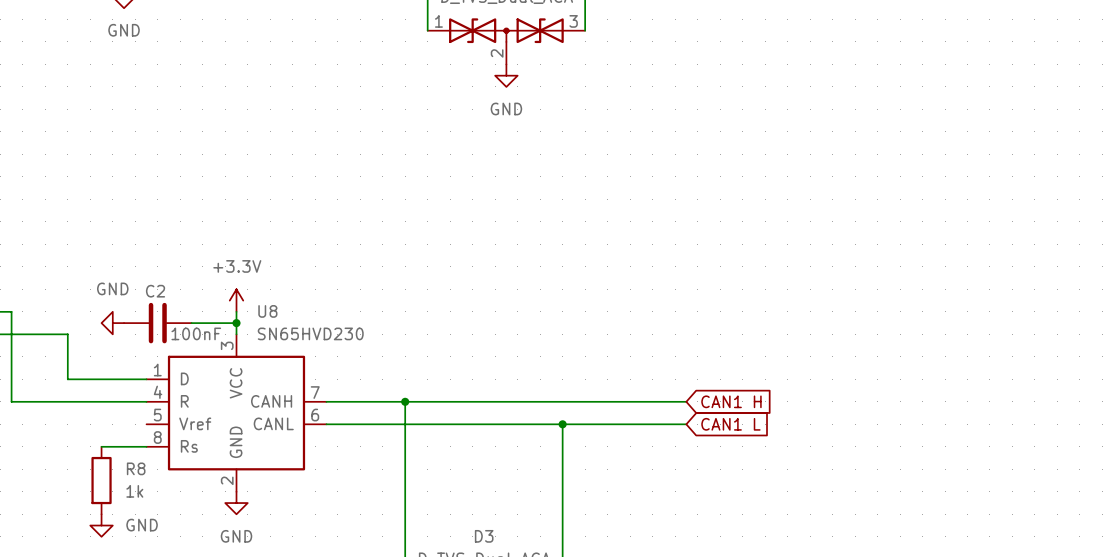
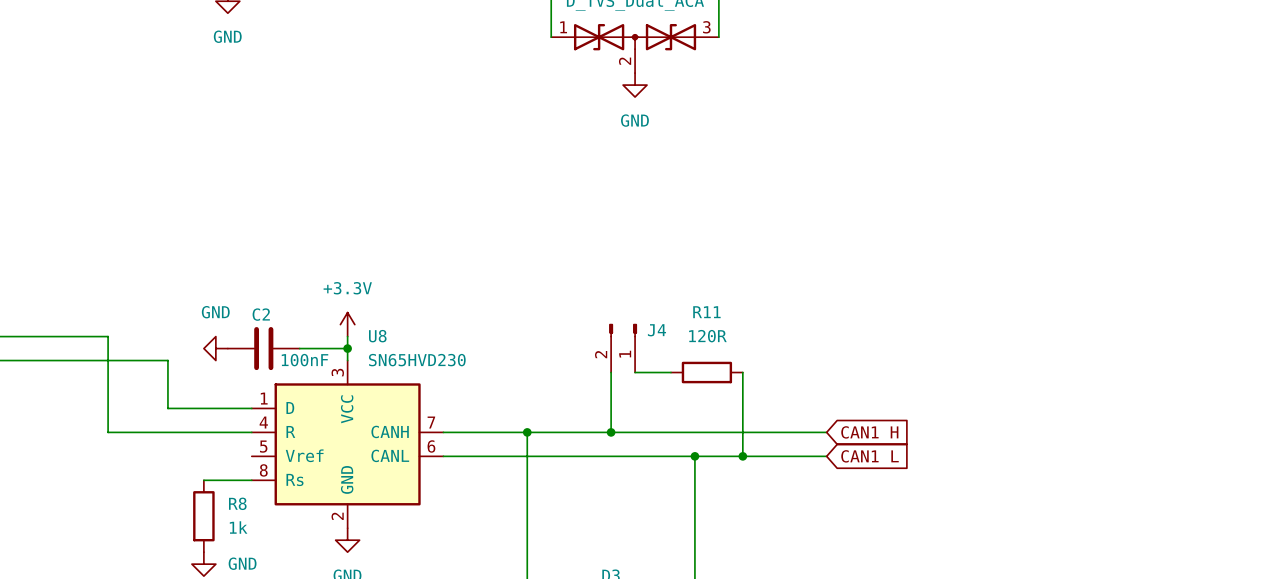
J4: none -> (623, 348)
wire: none -> (611, 372) (611, 432)
wire: none -> (635, 372) (670, 372)
R11: none -> 120R (706, 372)
wire: none -> (742, 372) (742, 456)
junction: none -> (611, 432)
junction: none -> (742, 456)

